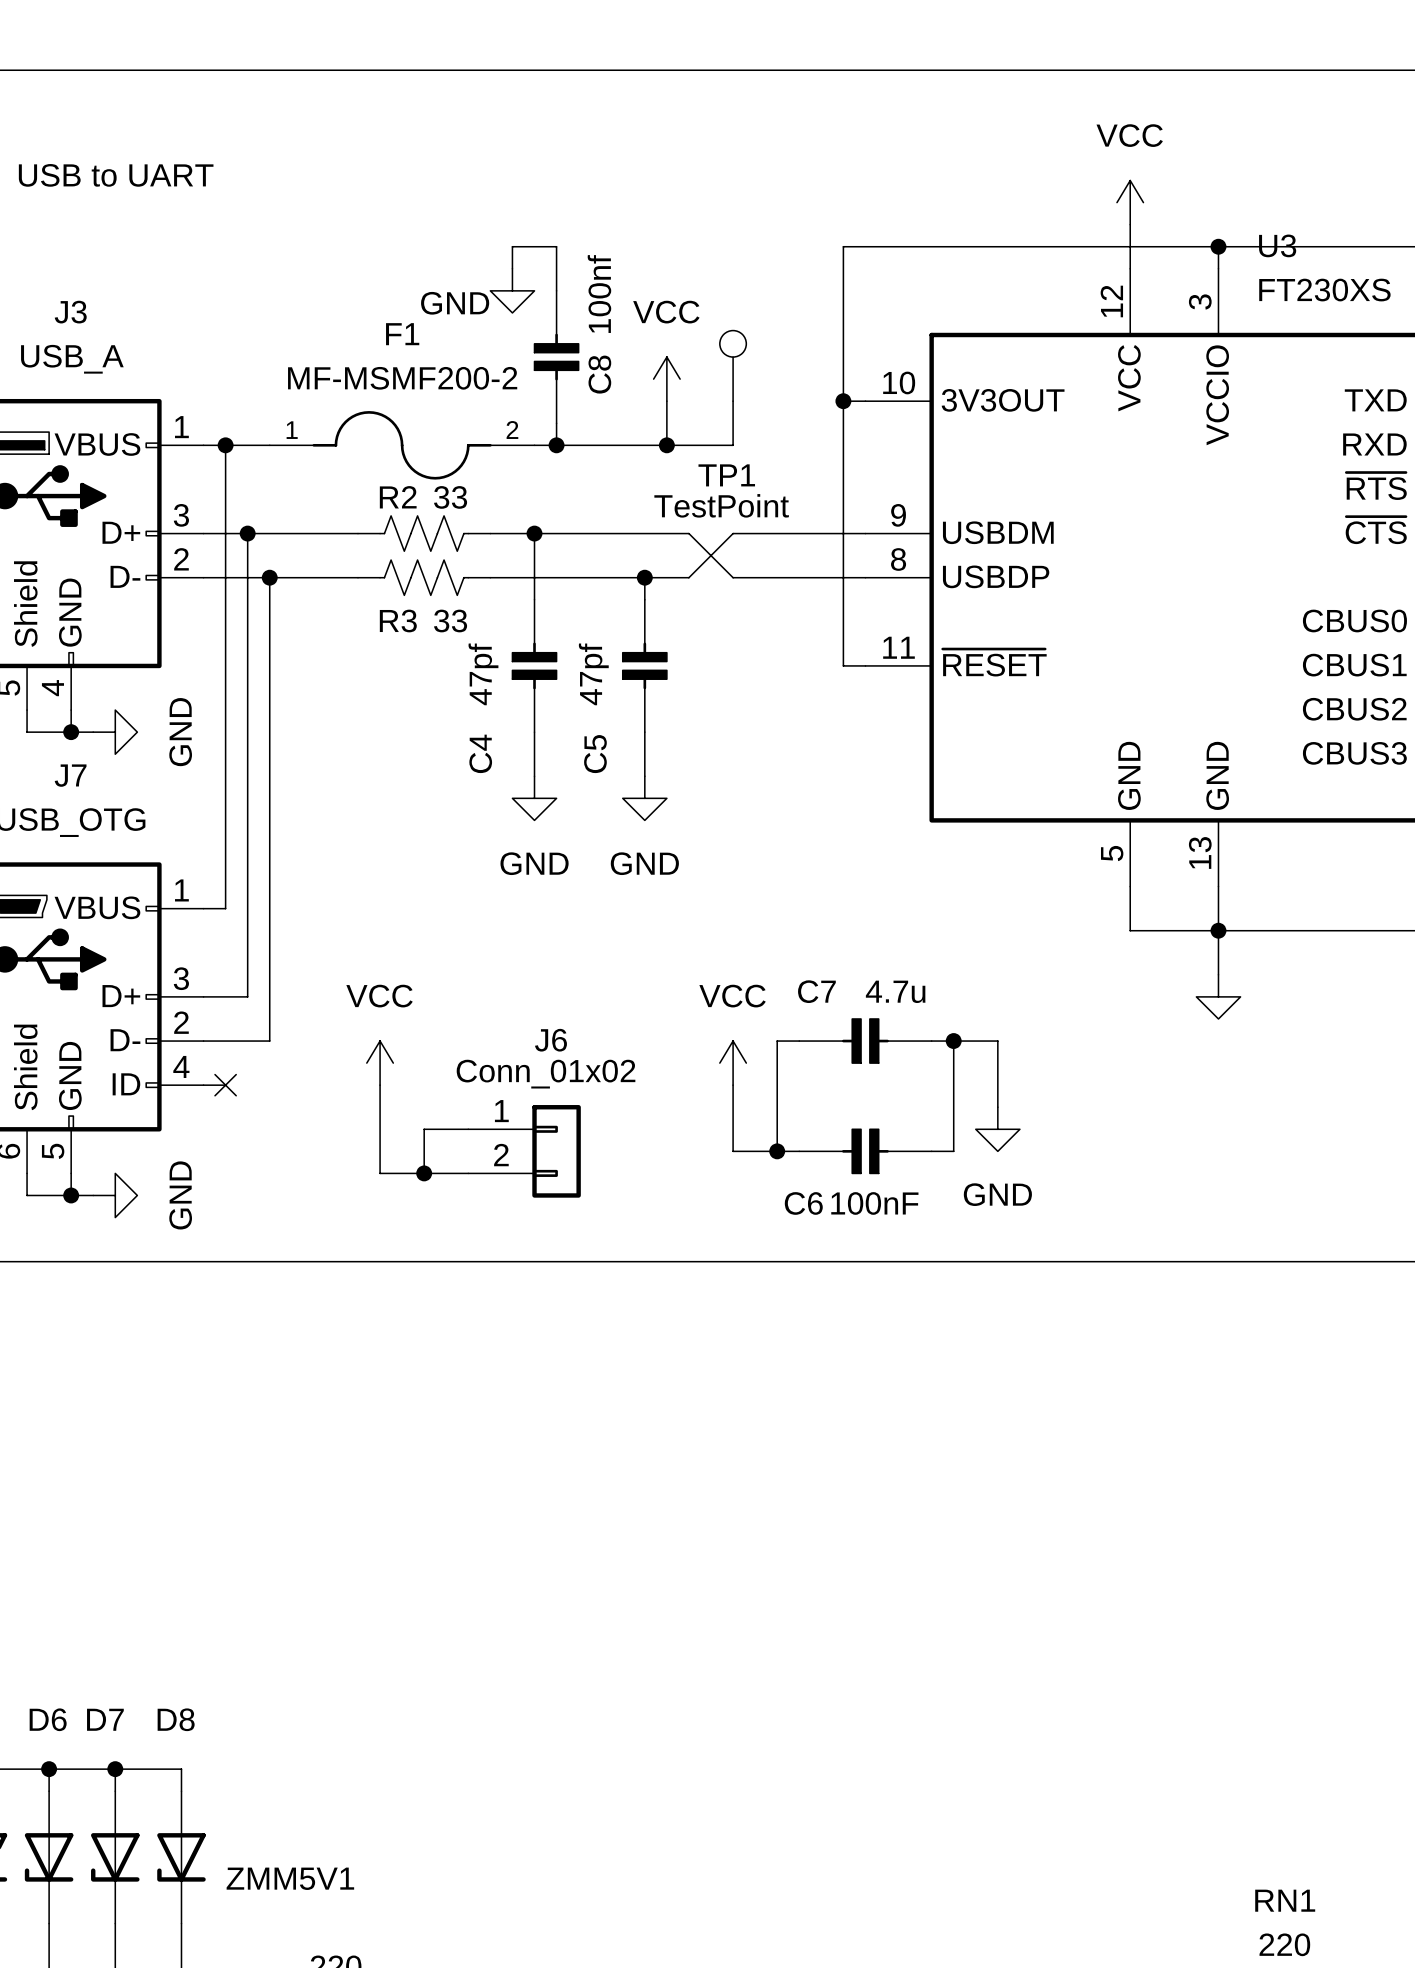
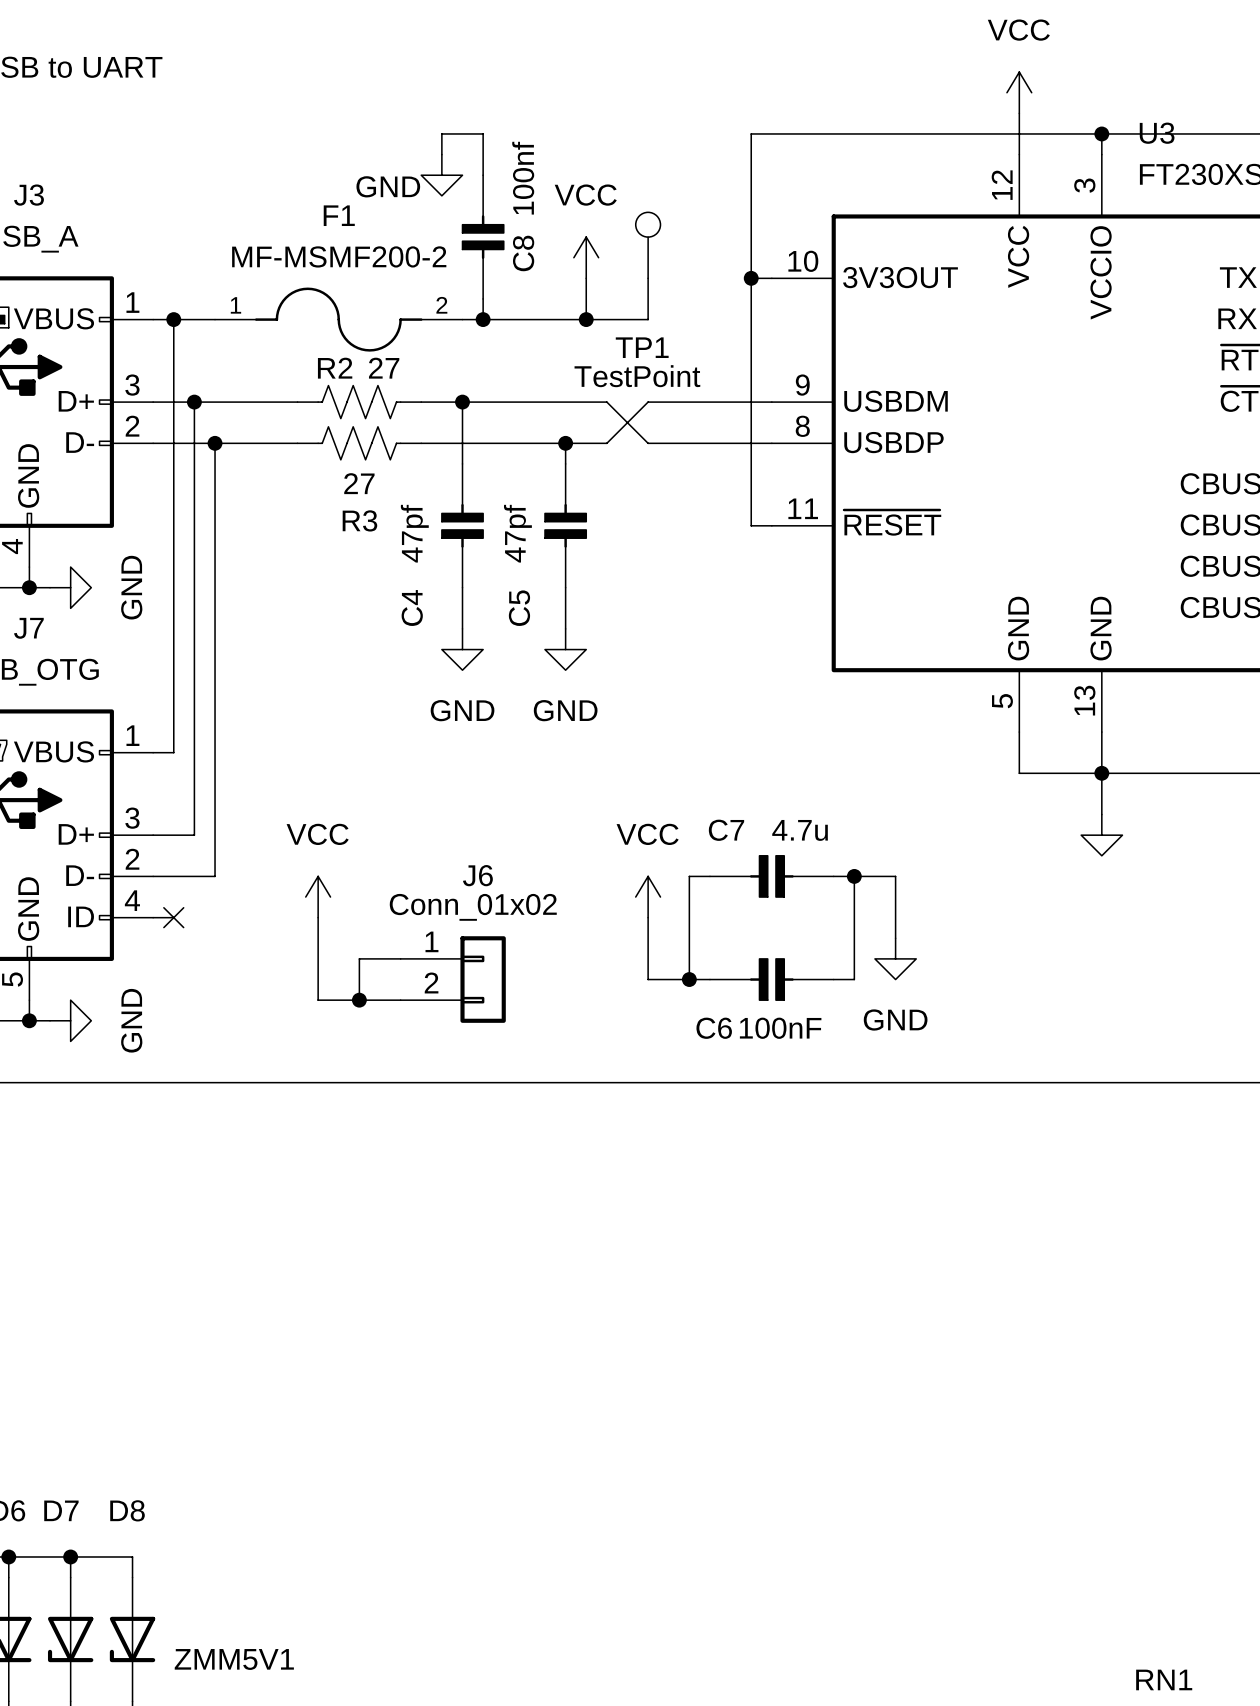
R2 value: 33 (450, 497) -> 27 (384, 368)
R3 name position: R3 (398, 620) -> R3 (359, 520)
R3 value: 33 (450, 620) -> 27 (359, 483)

